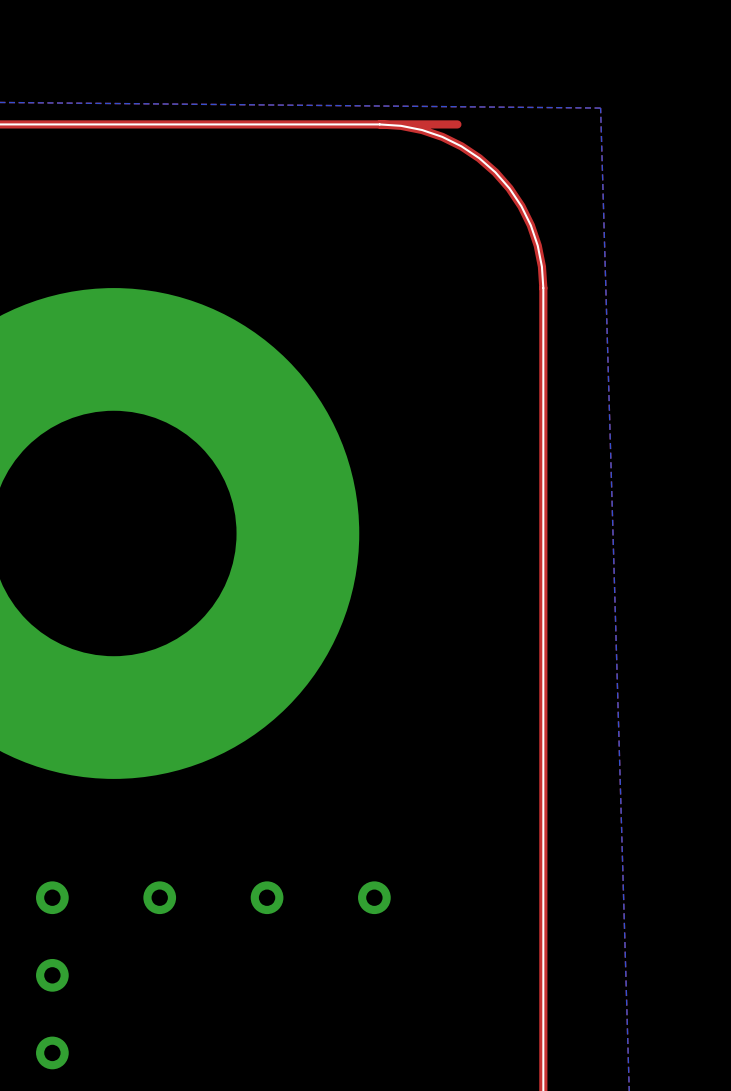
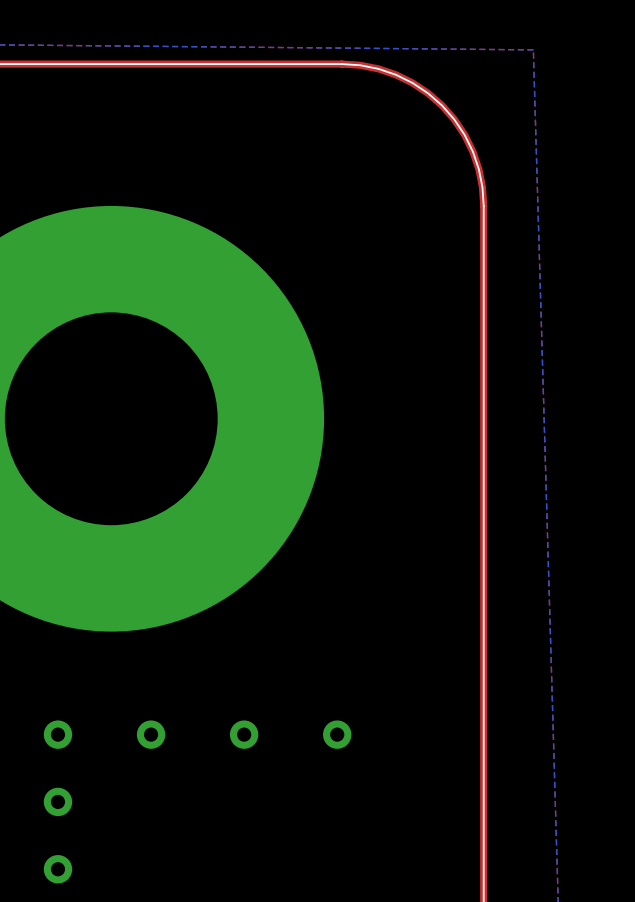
top track: (457, 124) (379, 124) -> none

